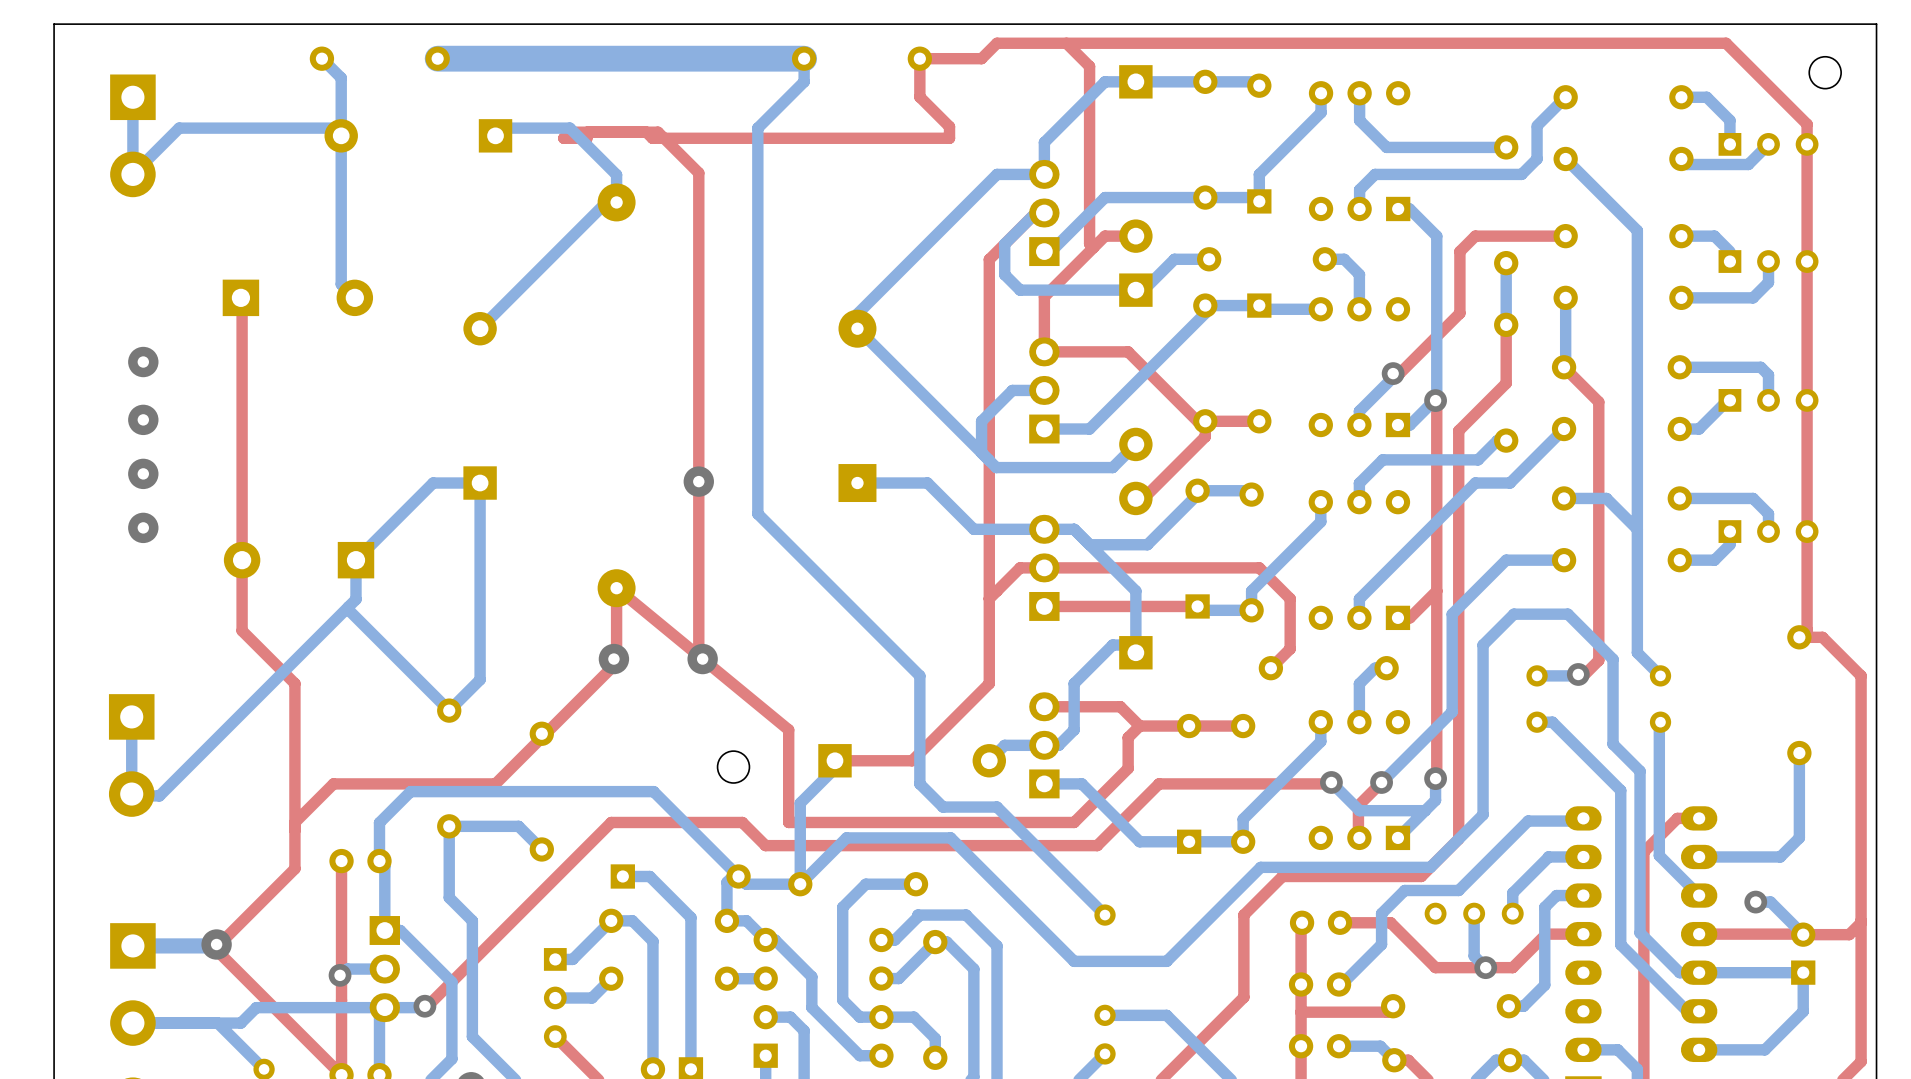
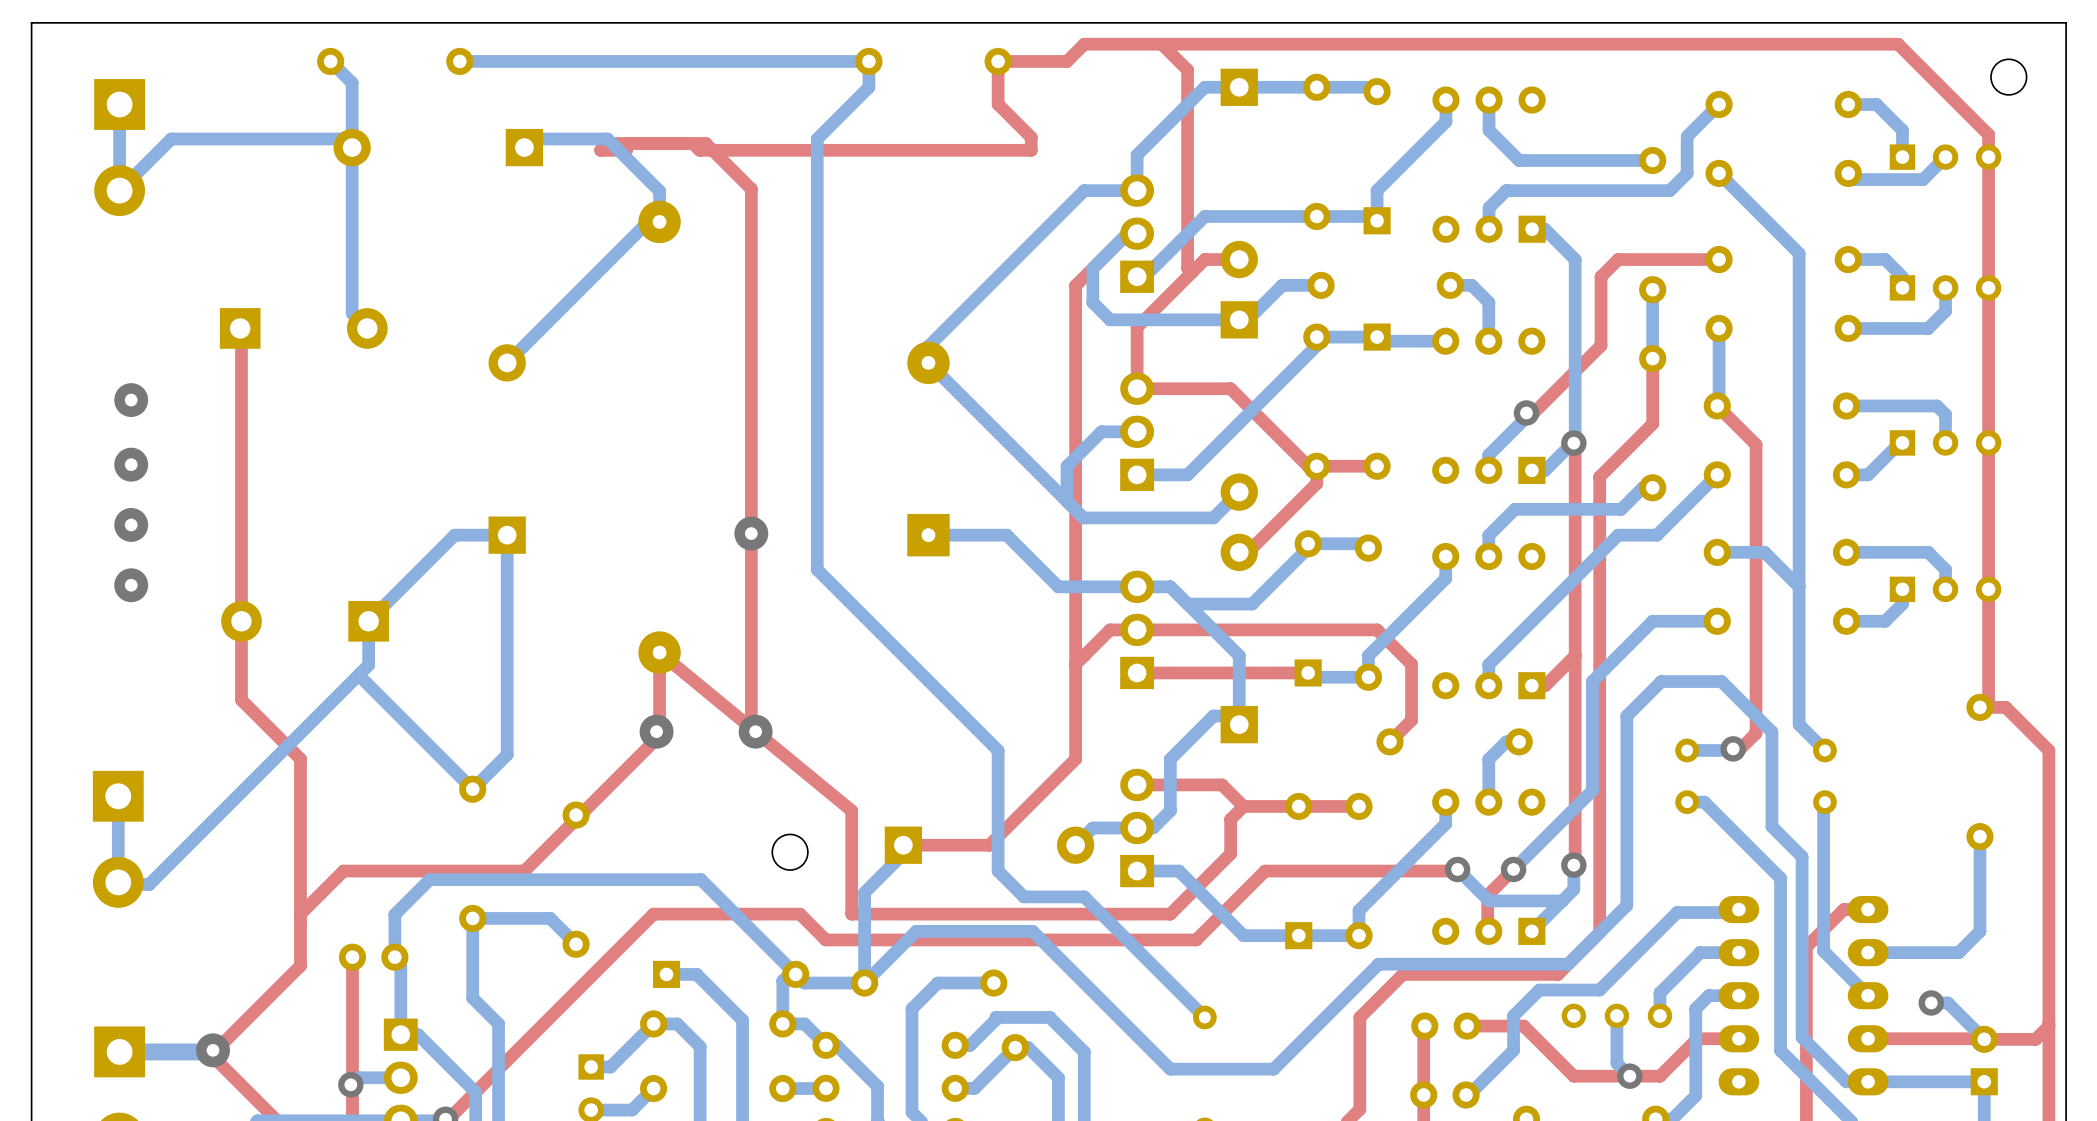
bottom track width: thick (804, 58) (437, 58) -> thin (868, 61) (459, 61)

